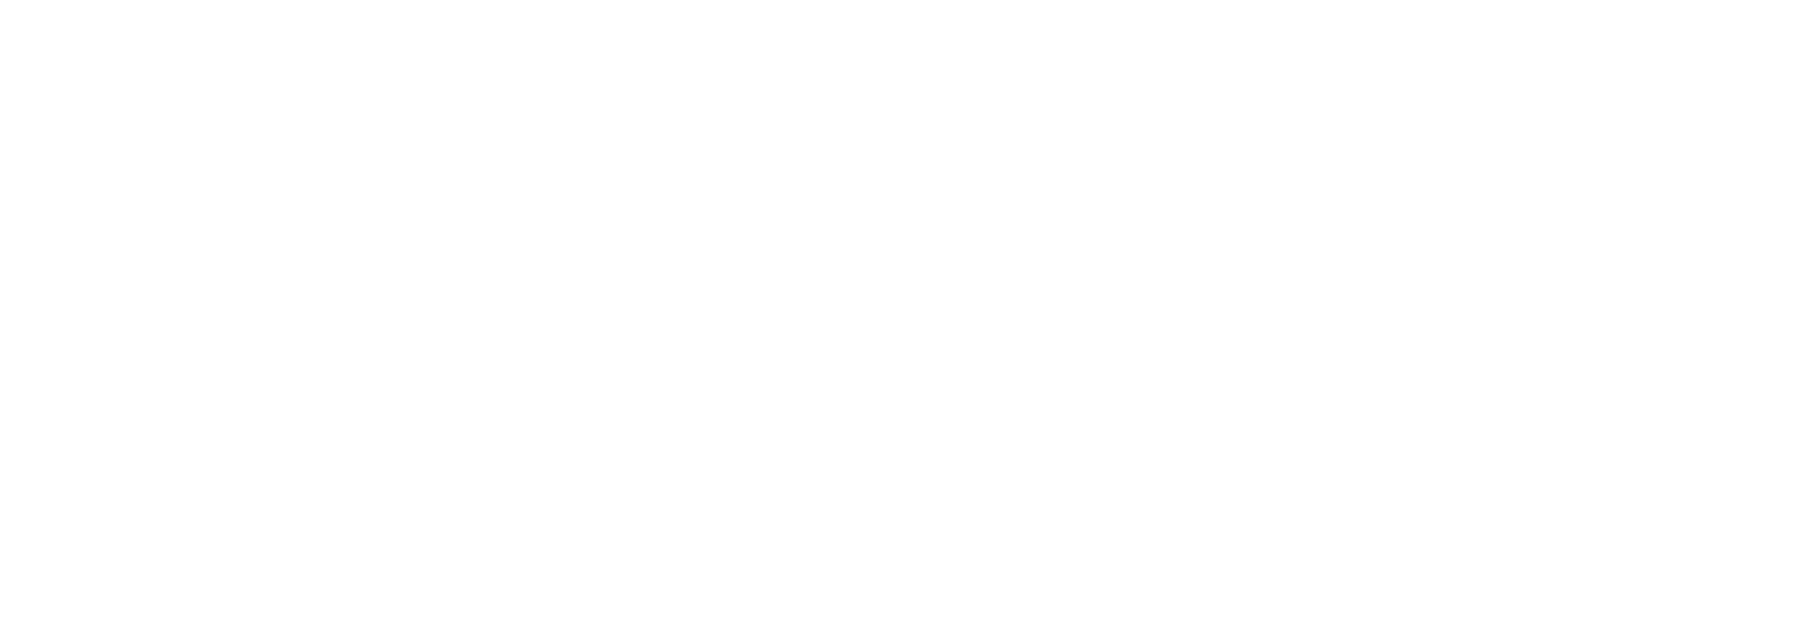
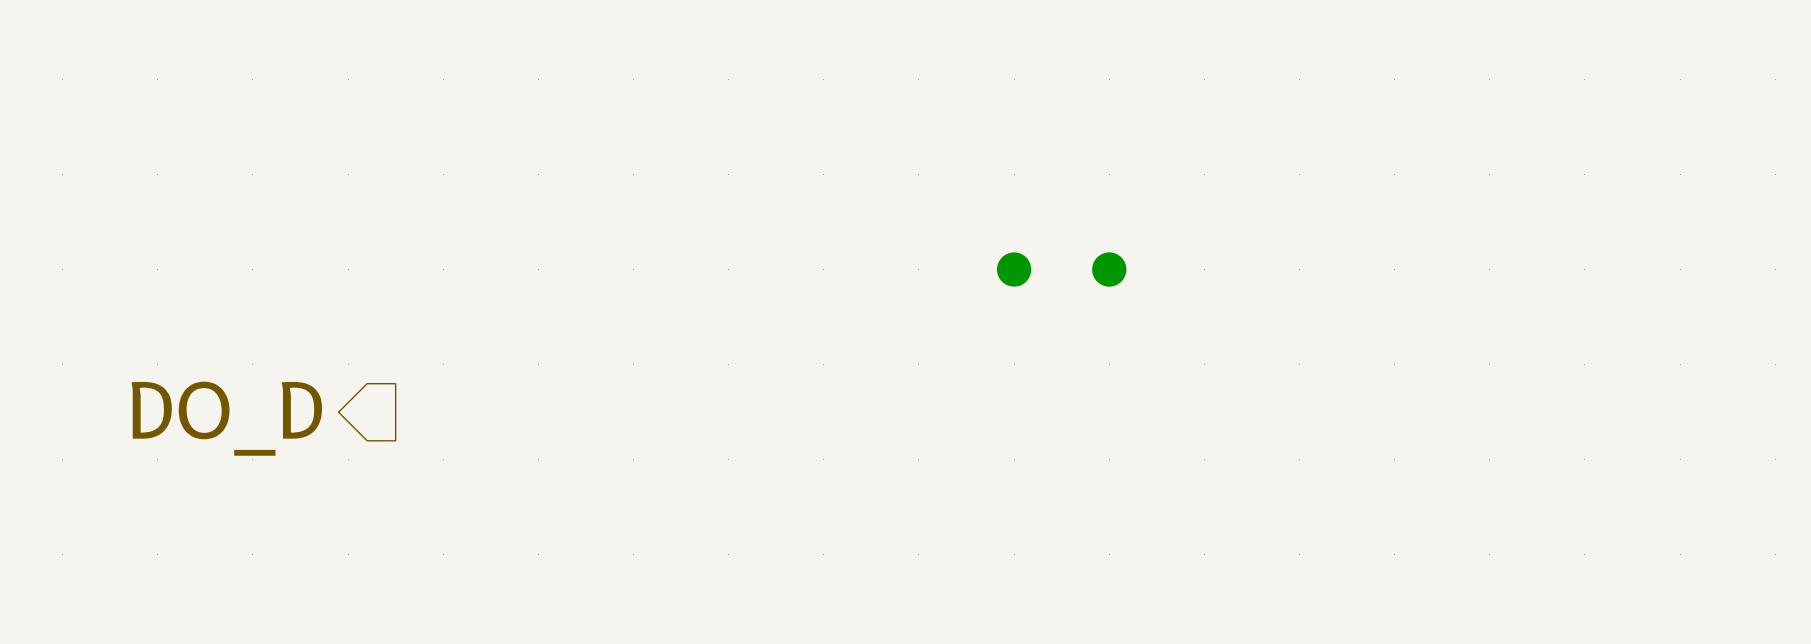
junction: none -> (1014, 269)
junction: none -> (1109, 269)
hierarchical label: none -> DO_D (226, 418)

